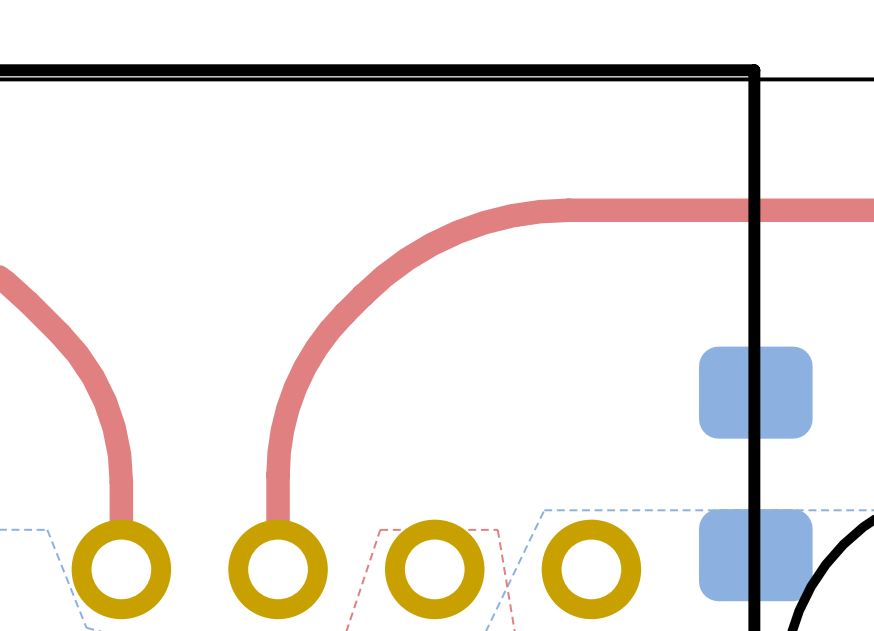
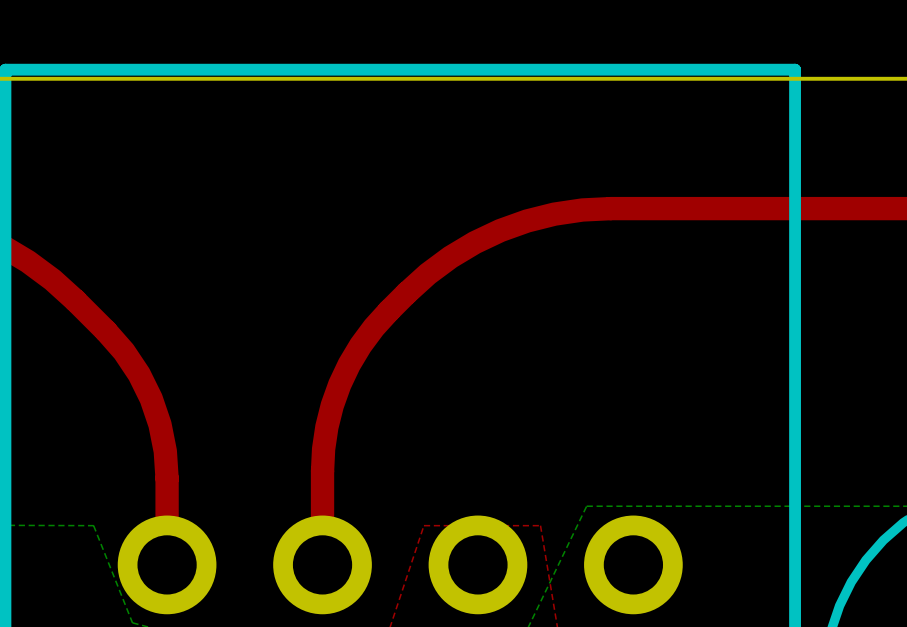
part: (755, 473) -> none

